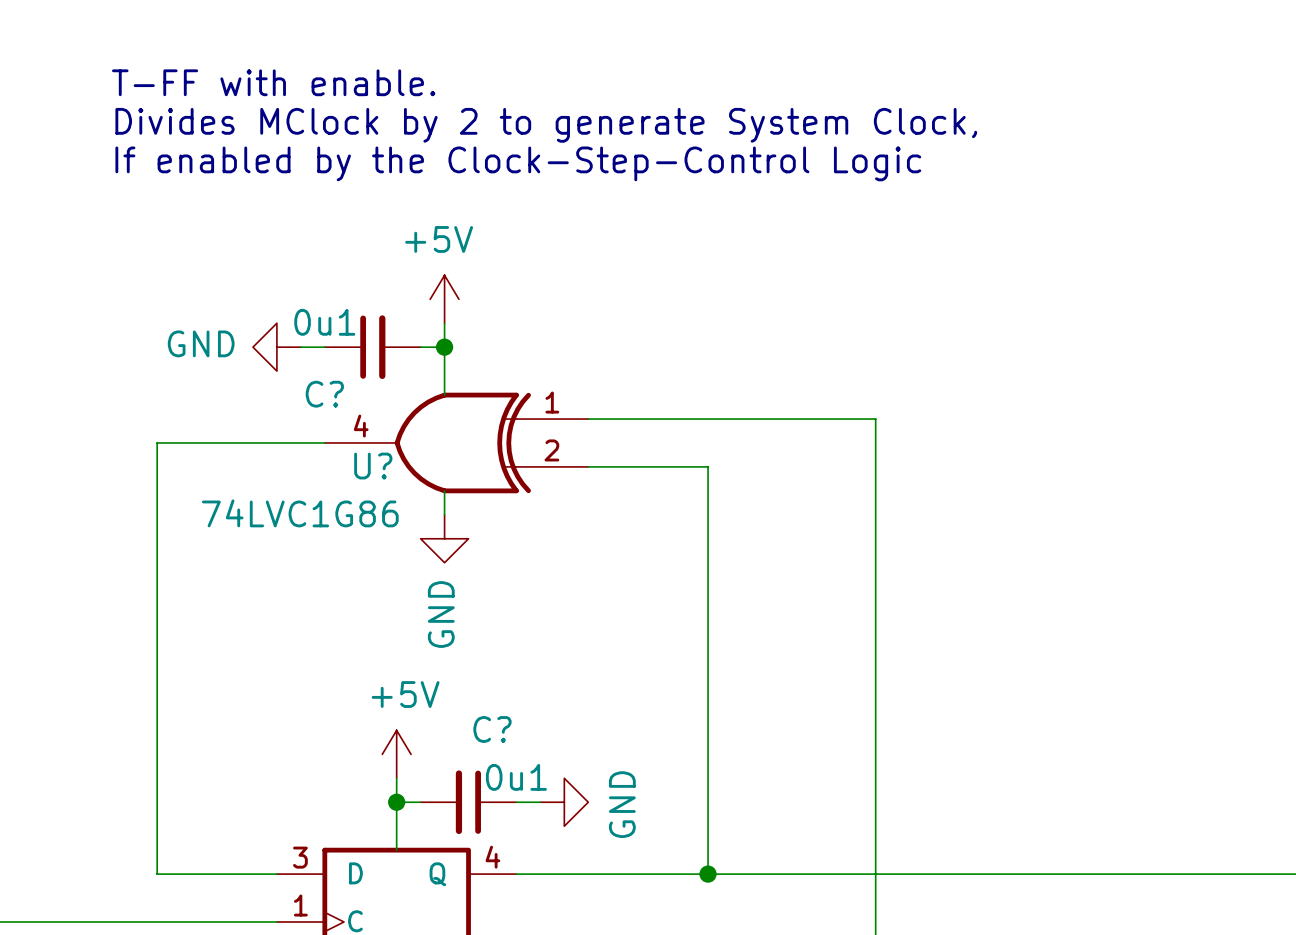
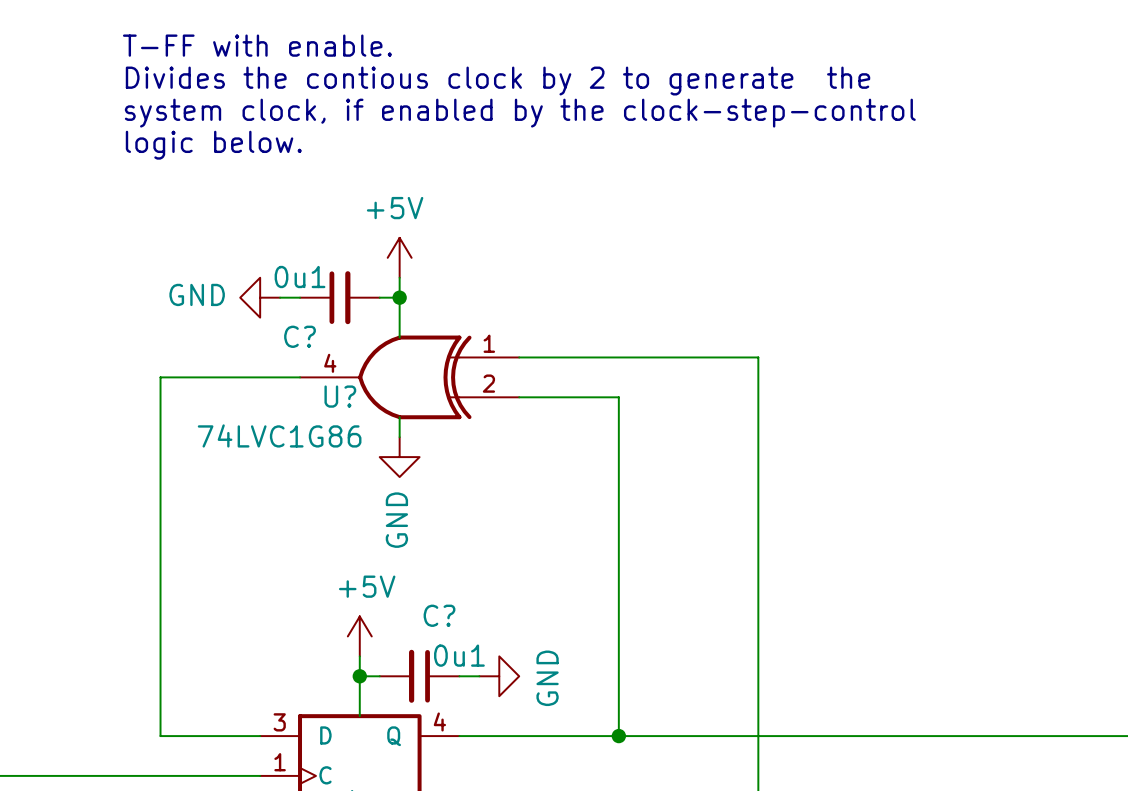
text: none -> T-FF with enable. (257, 45)
text: T-FF with enable. (273, 82) -> Divides the contious clock by 2 to generate the (498, 81)
text: Divides MClock by 2 to generate System Clock, (546, 125) -> system clock, if enabled by the clock-step-control (520, 113)
text: If enabled by the Clock-Step-Control Logic (518, 163) -> logic below. (213, 145)

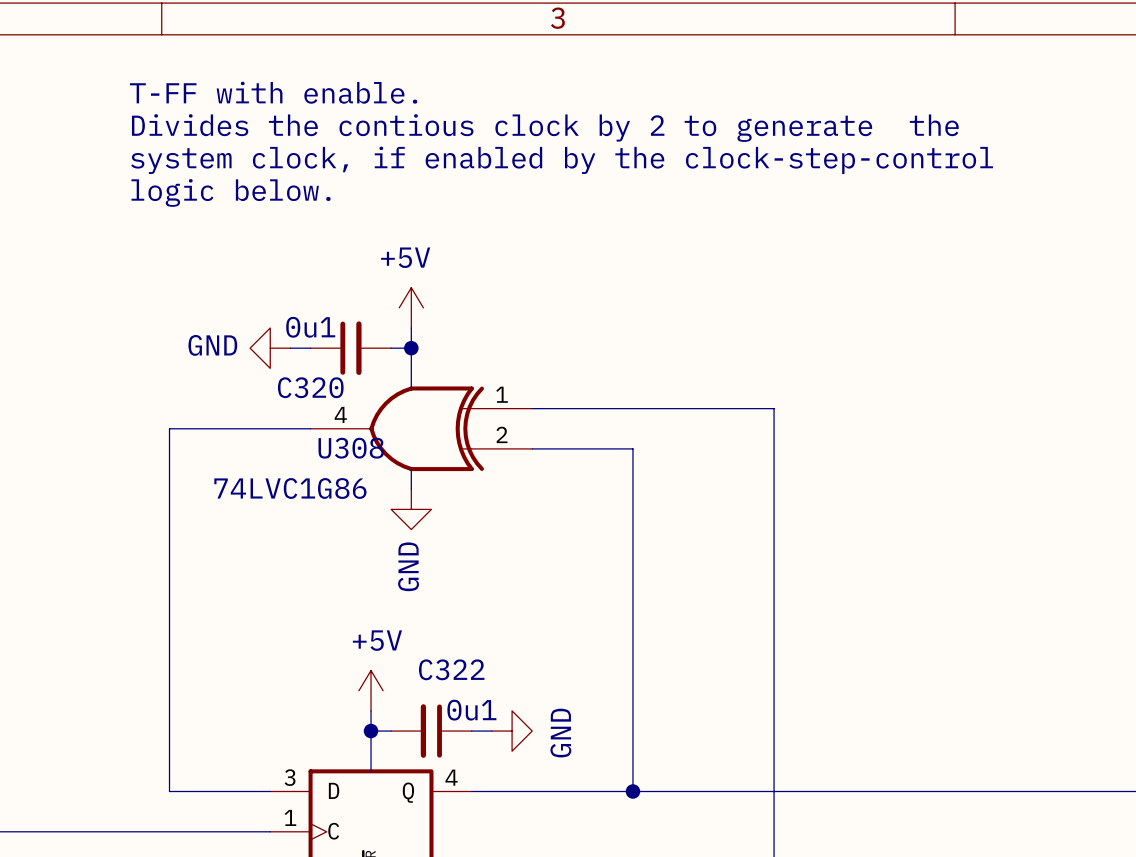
C? name: C? (300, 336) -> C320 (310, 387)
U? name: U? (340, 396) -> U308 (351, 448)
C? name: C? (439, 615) -> C322 (451, 669)

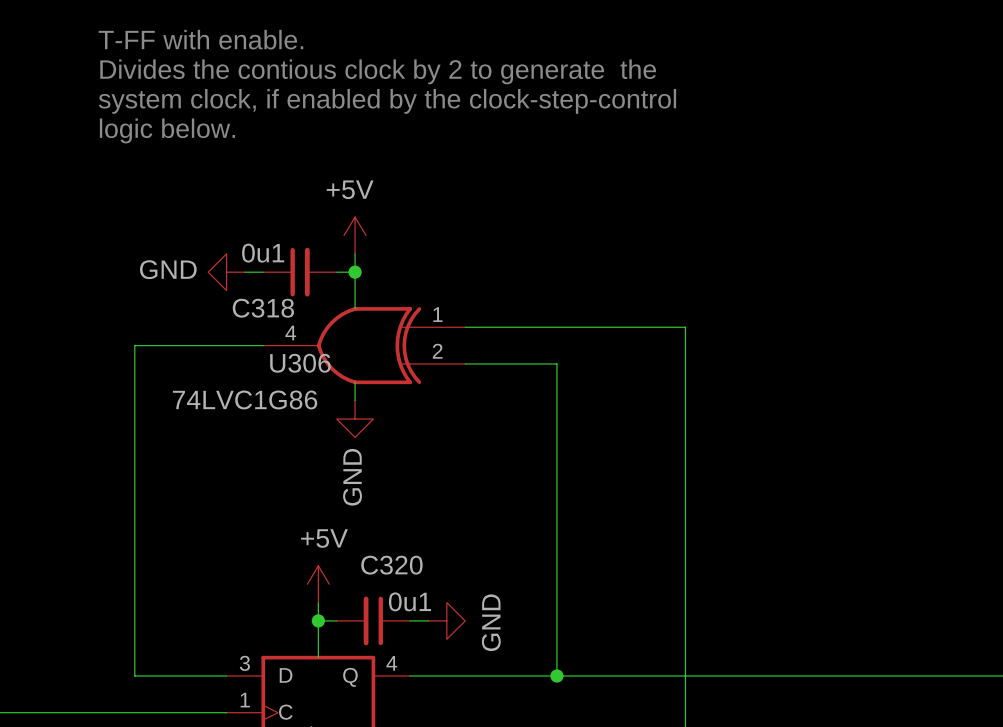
C320 name: C320 (310, 387) -> C318 (263, 308)
U308 name: U308 (351, 448) -> U306 (300, 363)
C322 name: C322 (451, 669) -> C320 (391, 565)

